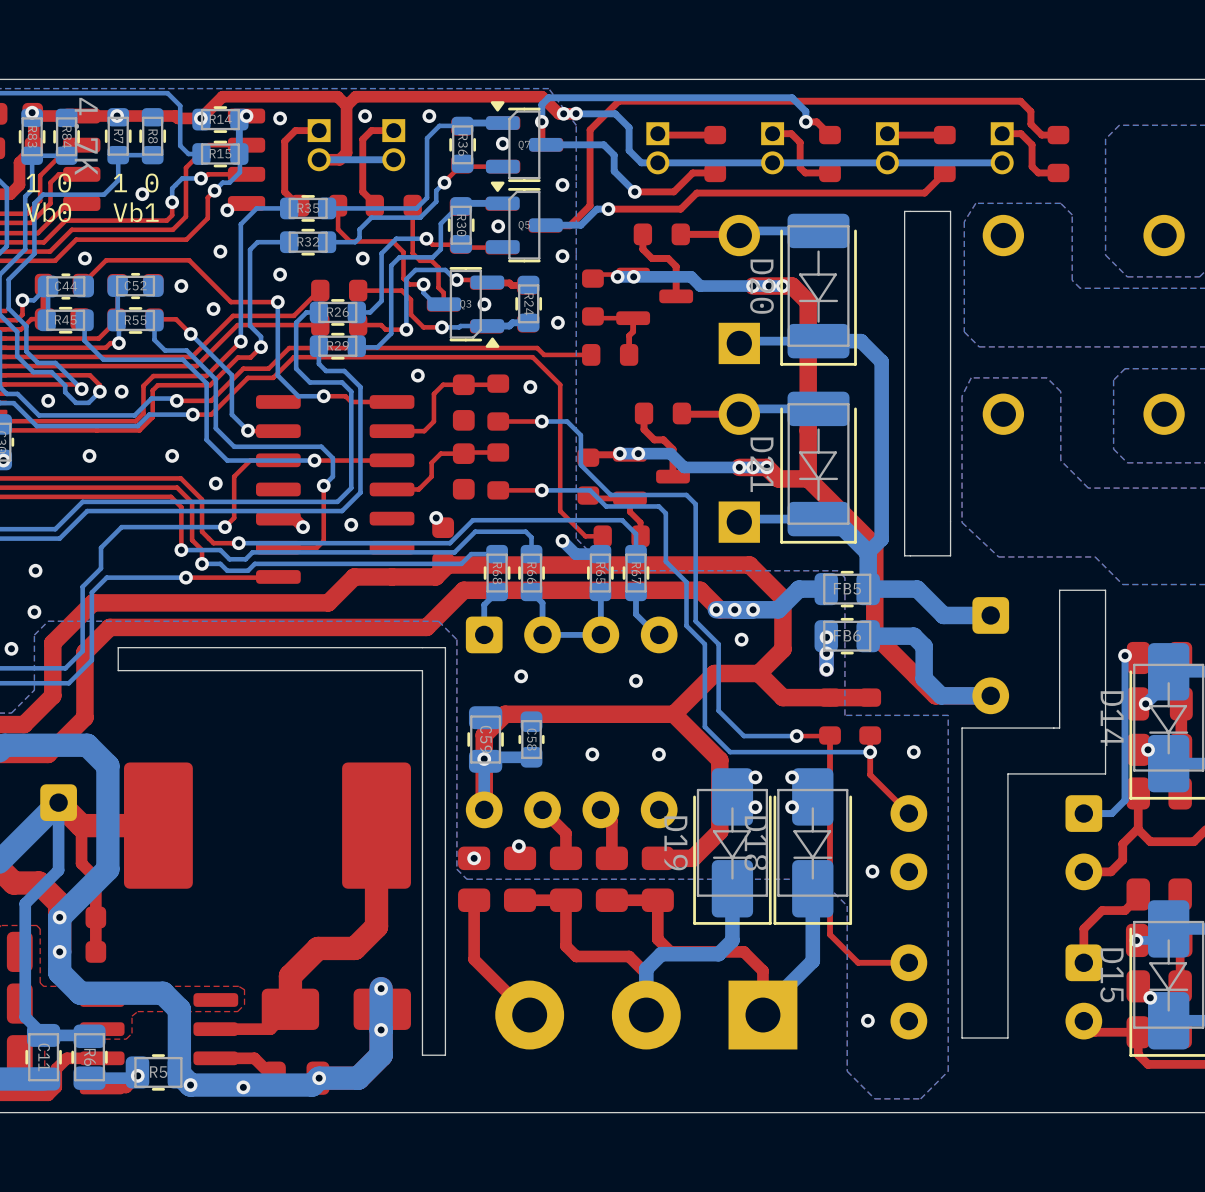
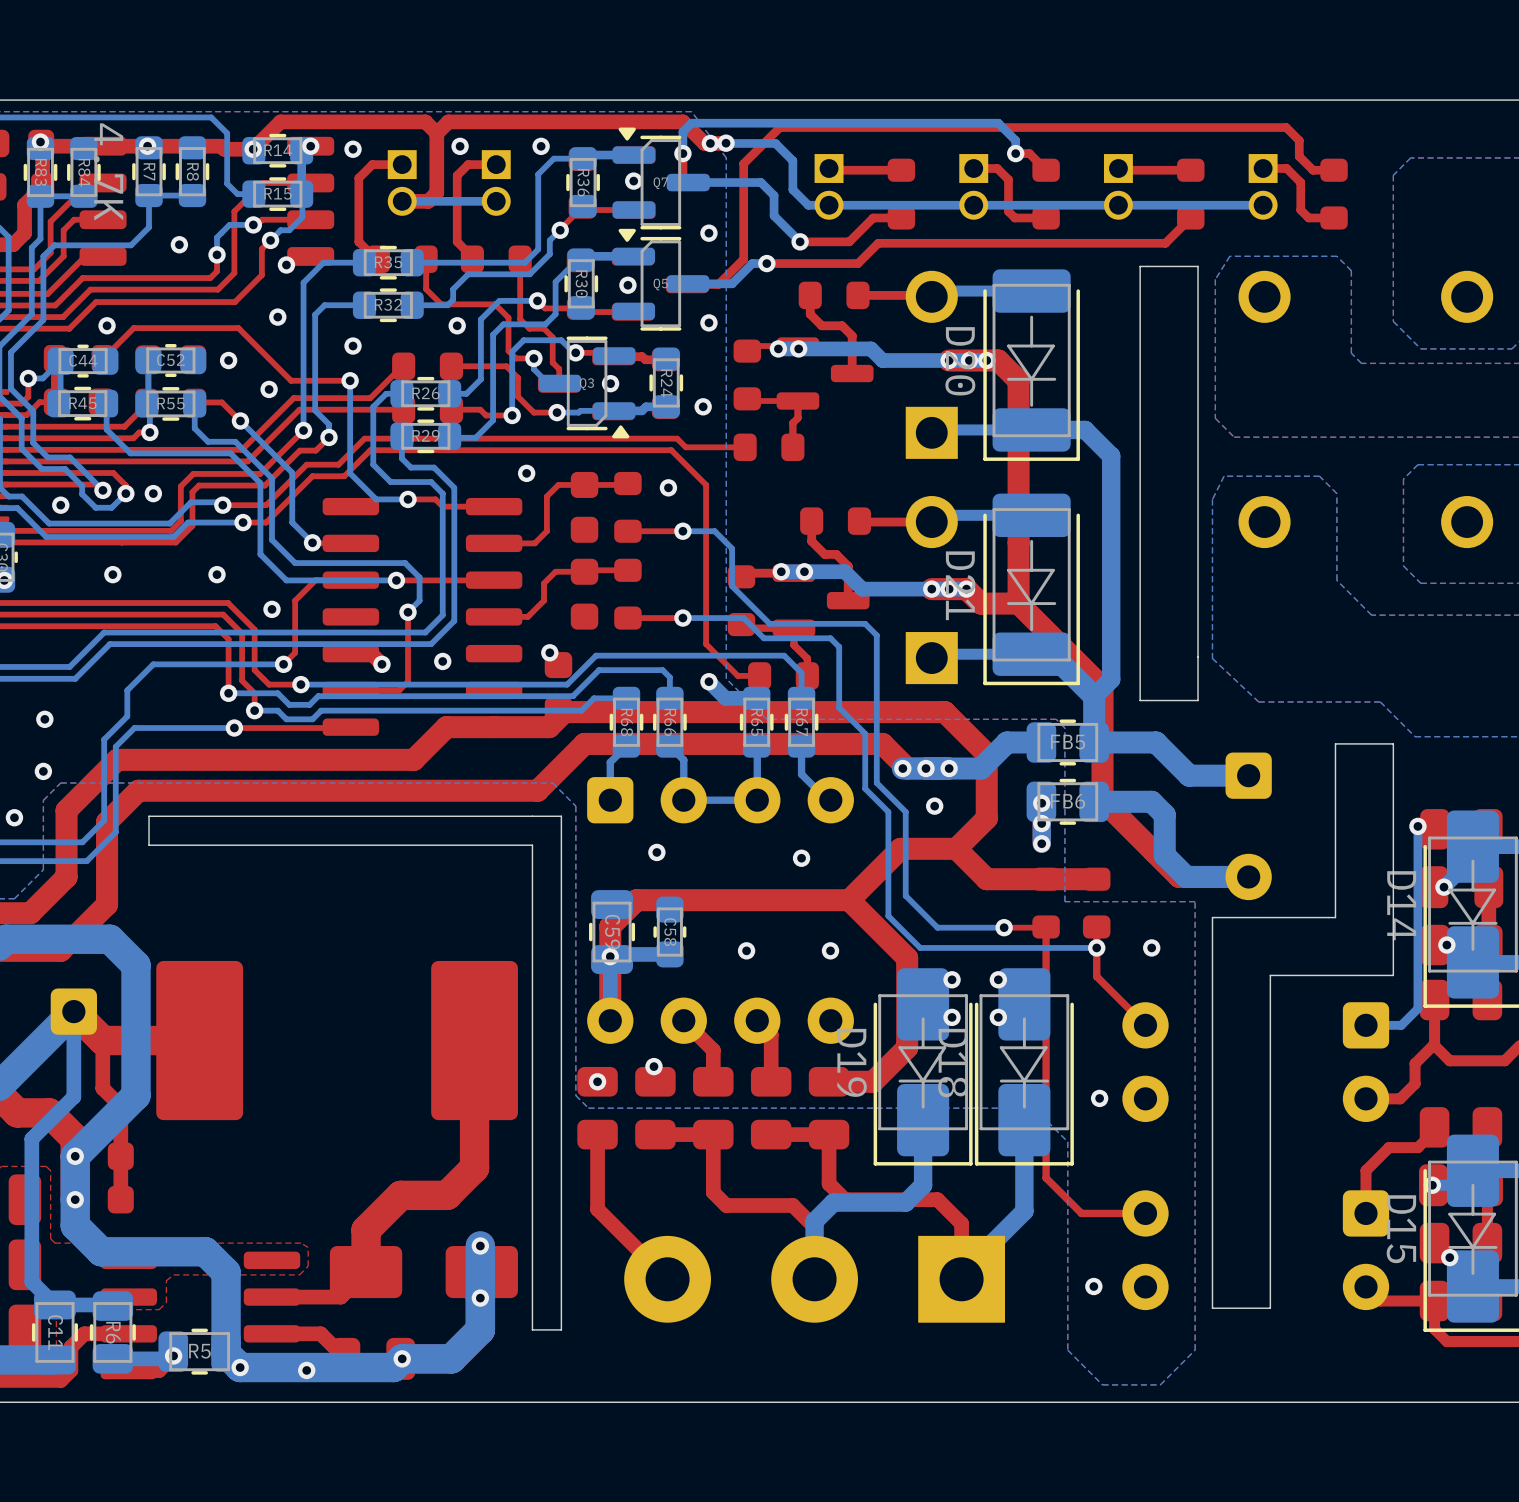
text: 1 0 (48, 183) -> none
text: 1 0 (136, 183) -> none
text: Vb0 (48, 212) -> none
text: Vb1 (136, 212) -> none

